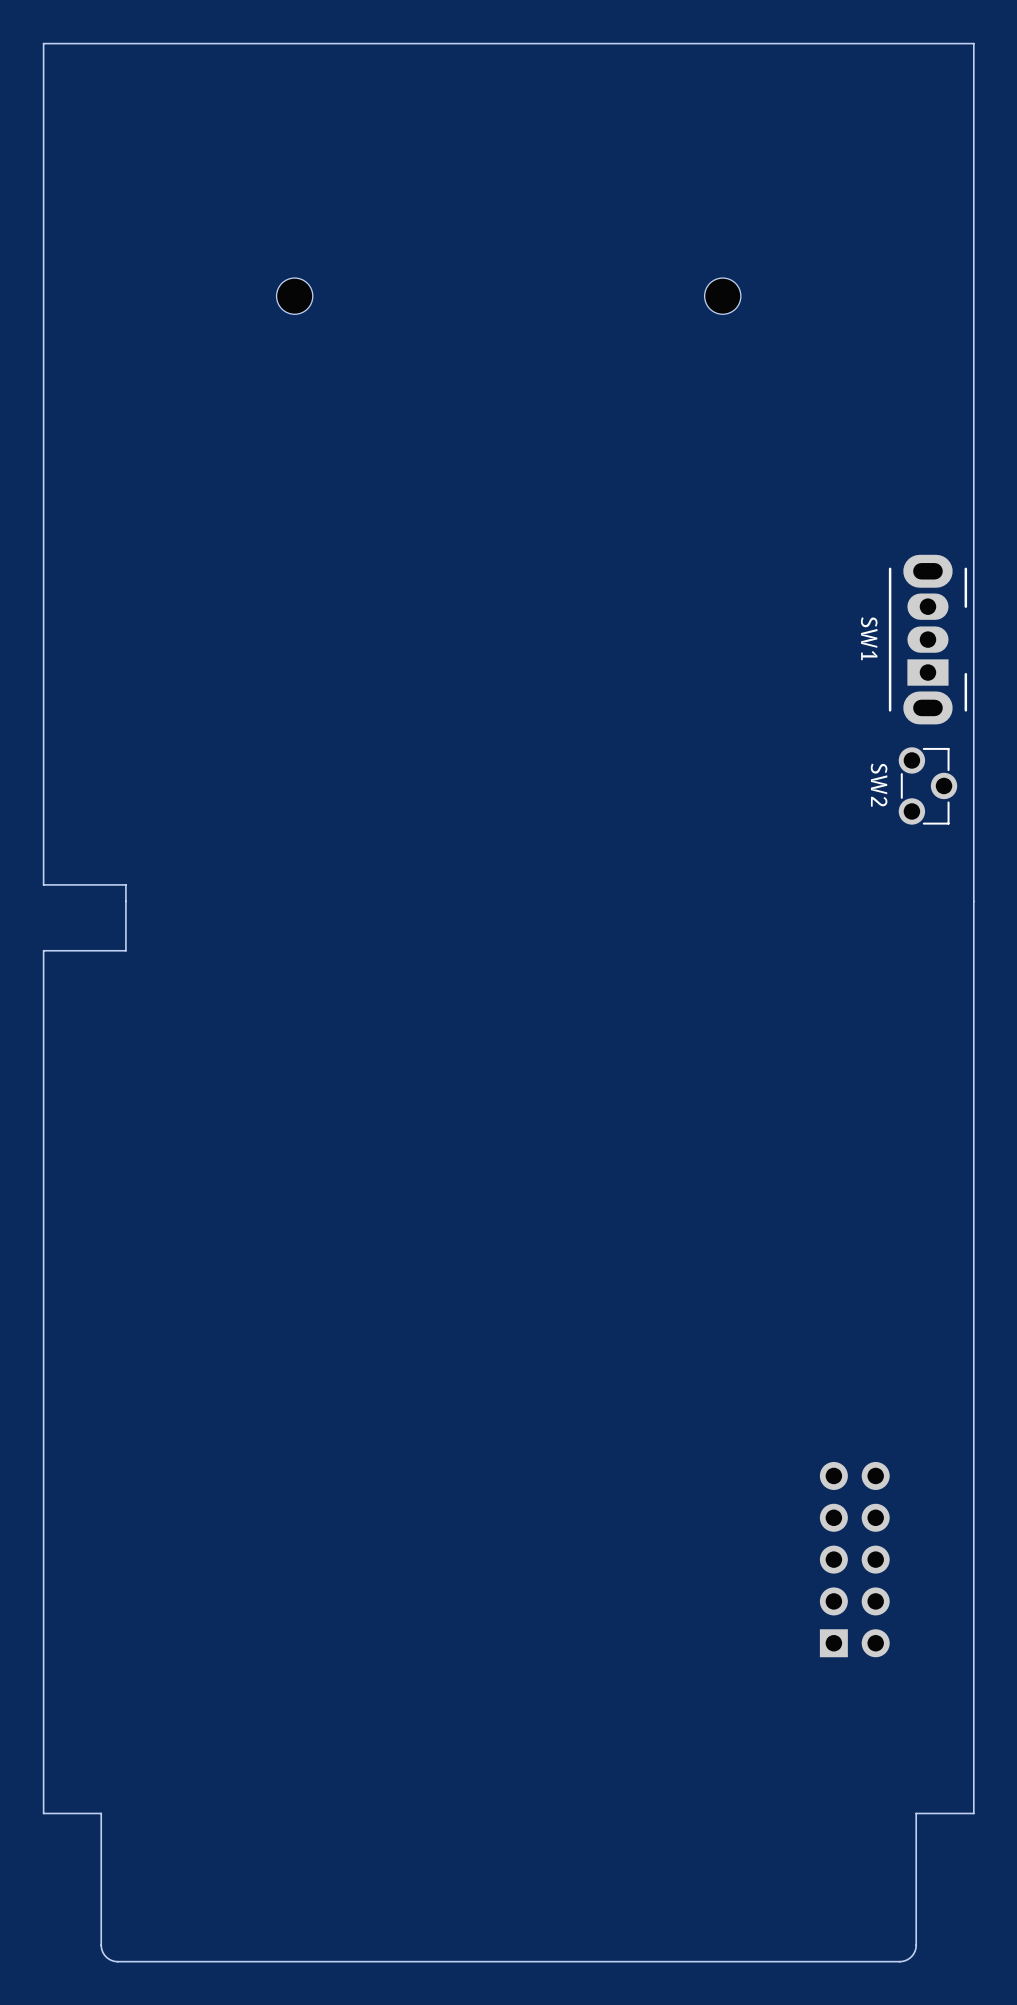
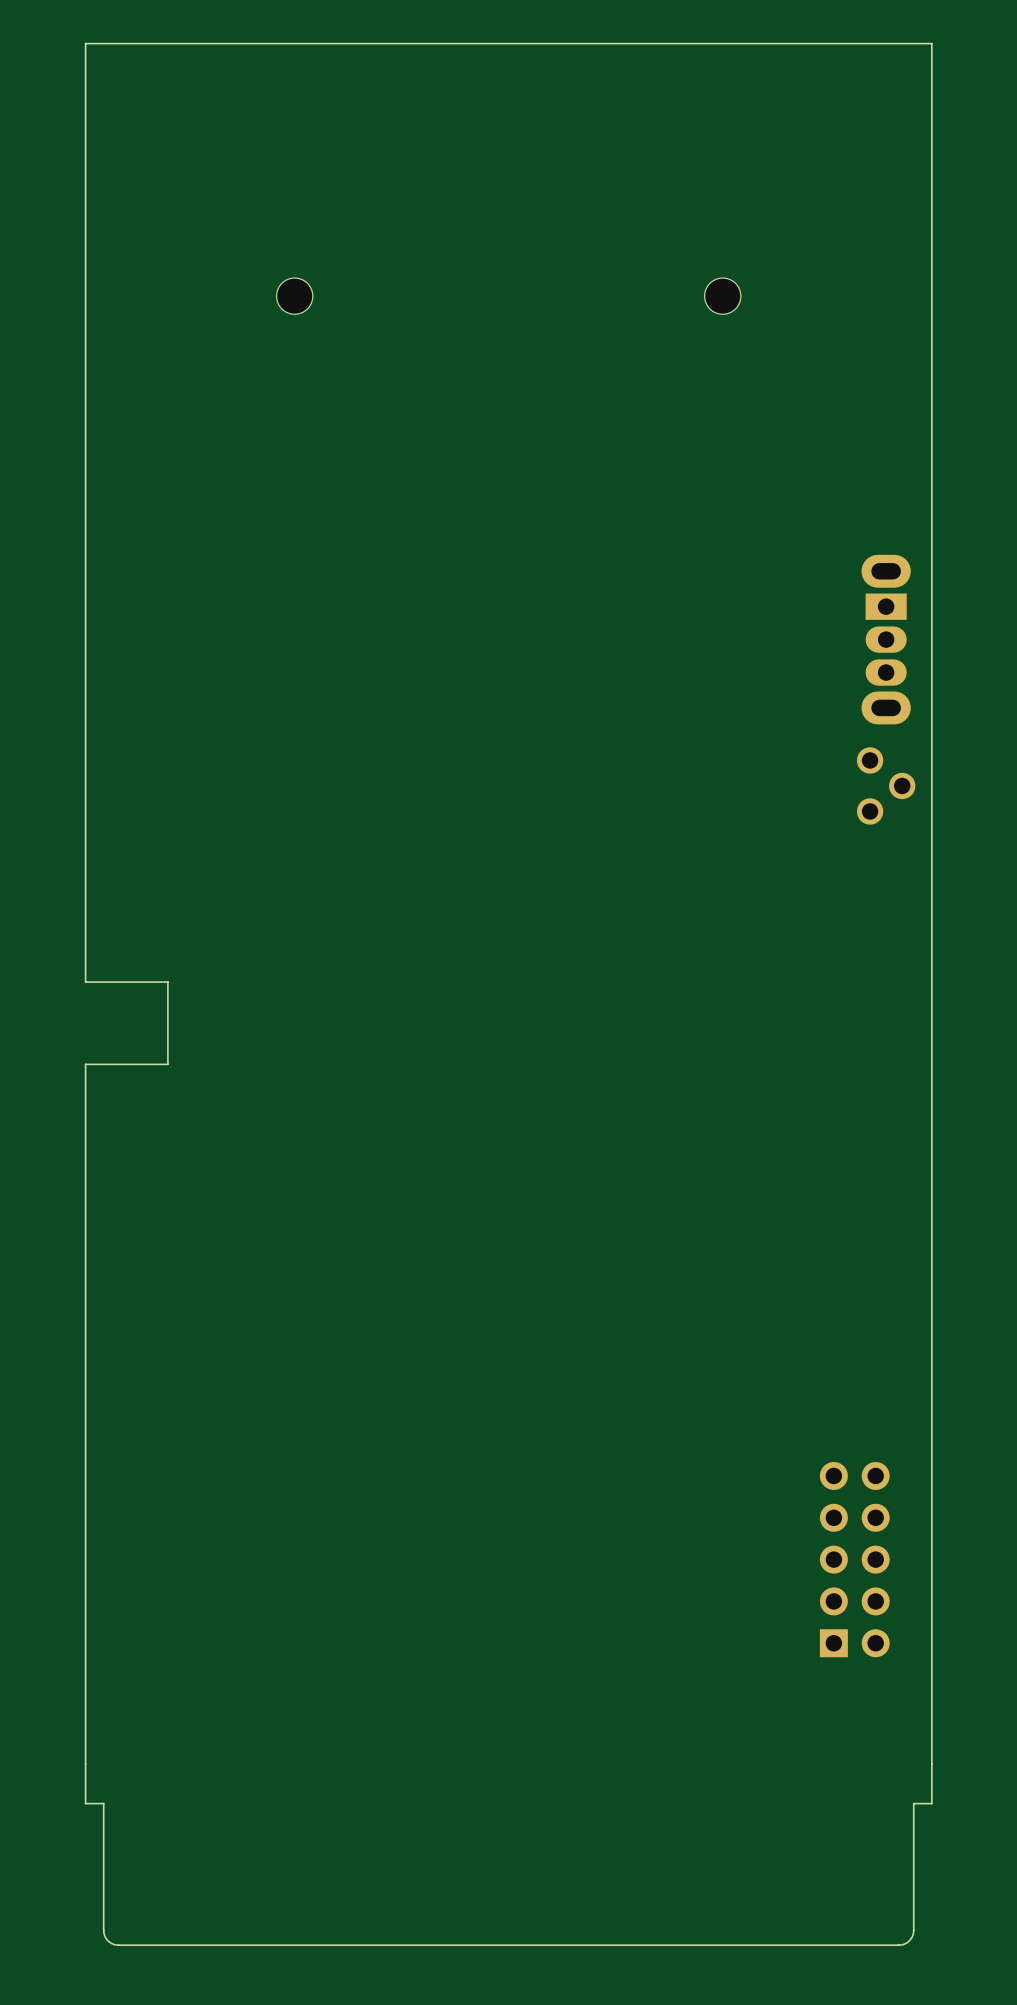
board edge: (85, 43) (43, 43) (43, 884) (125, 884) (125, 901) -> (85, 43) (85, 982) (167, 982) (167, 1064) (85, 1064) (85, 1764)
board edge: (931, 43) (973, 43) (973, 901) -> (931, 43) (931, 1764)
SW1 side: bottom (927, 639) -> top (886, 639)
SW2 side: bottom (927, 785) -> top (886, 785)
part: (508, 1431) -> none
part: none -> (508, 1854)

